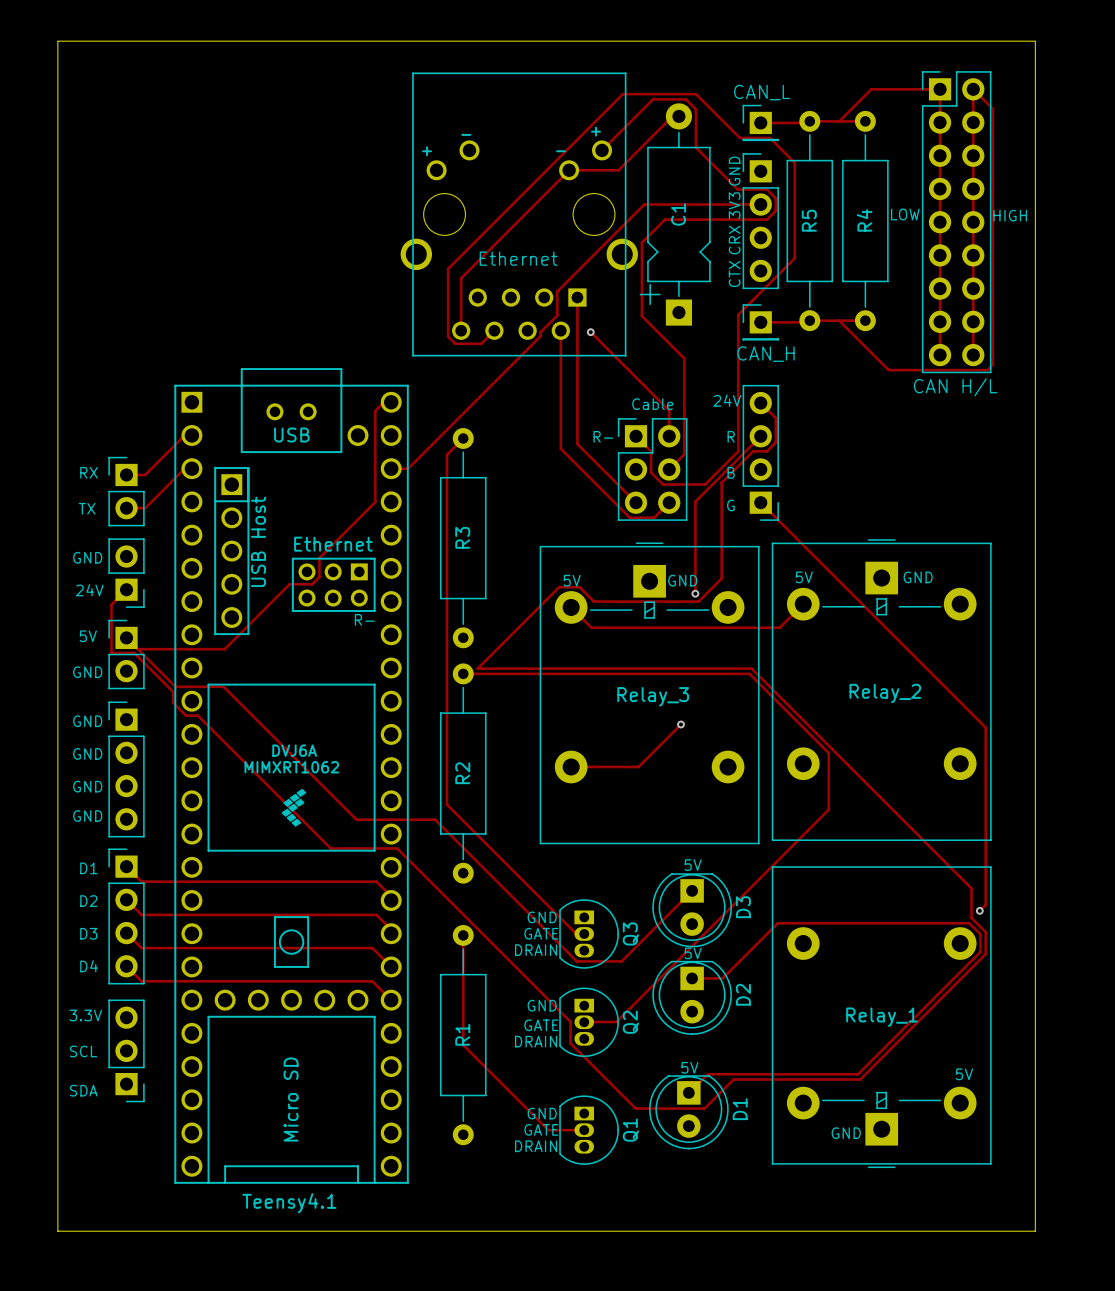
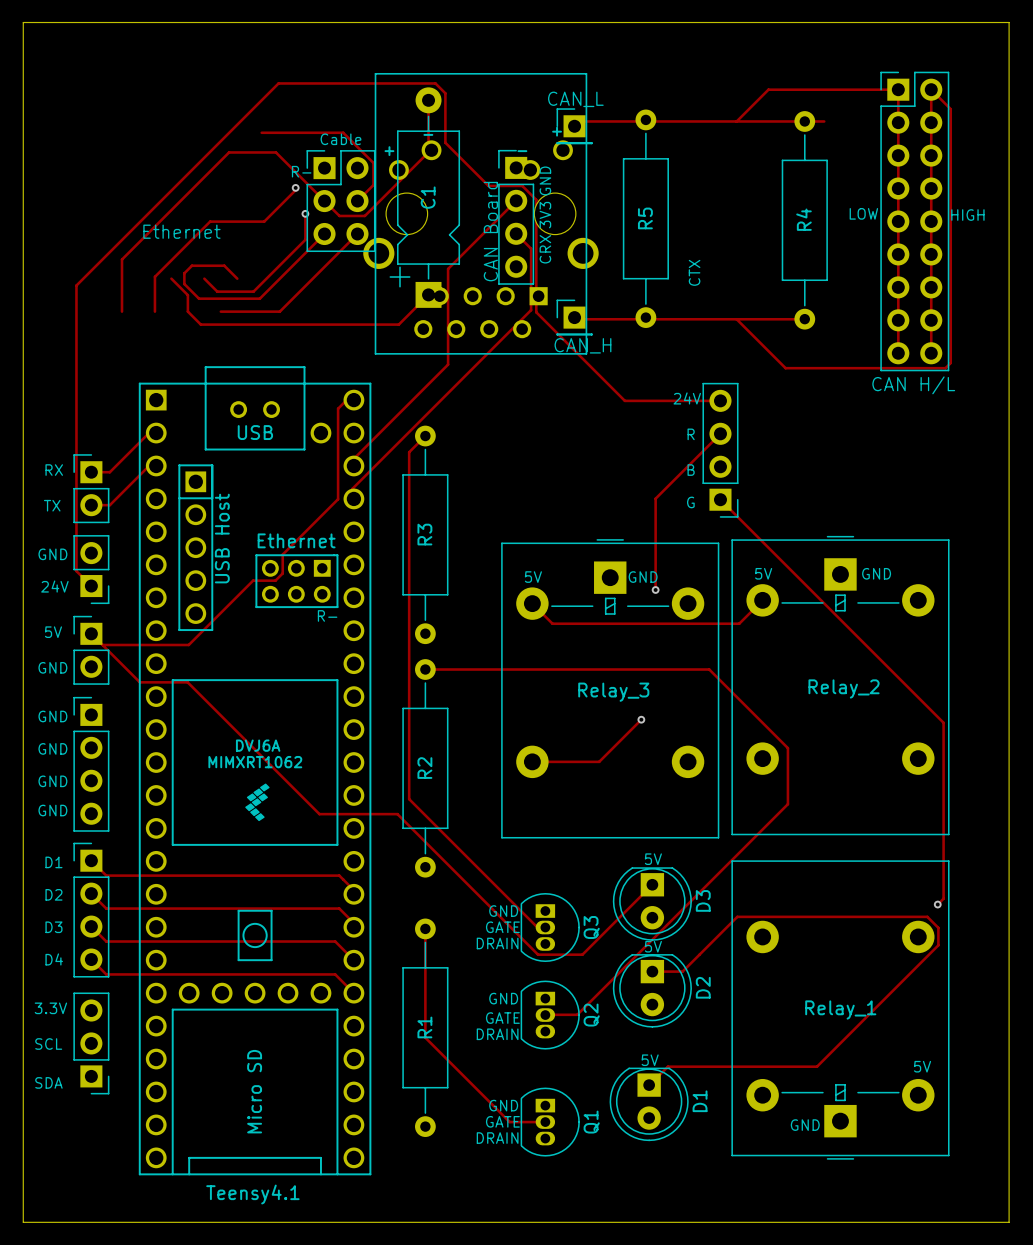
board edge: (57, 41) (1035, 41) (1035, 1231) -> (23, 41) (23, 22) (1009, 22) (1009, 1222) (992, 1222)
track: (871, 89) (839, 121) -> (830, 89) (768, 89) (736, 121)
text position: CAN_L (762, 92) -> CAN_L (575, 99)
track: none -> (428, 100) (428, 152) (364, 215) (339, 215) (275, 152) (229, 152) (121, 259) (121, 311)
track: (672, 116) (618, 170) (569, 170) (461, 278) (461, 330) -> none
track: (809, 121) (808, 122) (757, 122) -> (769, 121) (574, 121)
part: (760, 122) -> none
part: none -> (574, 126)
track: none -> (261, 132) (343, 132) (373, 163) (373, 185) (357, 201)
text: none -> Cable (340, 139)
track: (602, 150) (653, 99) (685, 99) (695, 109) (695, 147) (737, 189) (767, 189) (775, 198) (775, 210) (767, 219) (665, 219) (641, 242) (641, 316) (684, 358) (684, 454) (669, 469) -> none
text position: GND (734, 171) -> GND (545, 180)
text: none -> R- (301, 171)
track: none -> (295, 187) (295, 190) (264, 221) (210, 221) (154, 276) (154, 311)
via: none -> (295, 187)
part: none -> (341, 201)
track: none -> (516, 200) (448, 268) (448, 364) (352, 460)
track: (760, 204) (644, 204) (557, 291) (557, 315) (540, 332) (540, 336) (408, 468) (391, 468) -> none
text position: 3V3 (734, 205) -> 3V3 (545, 215)
track: none -> (305, 213) (305, 239) (253, 291) (217, 291) (204, 278)
via: none -> (305, 213)
C1 position: (675, 214) -> (424, 197)
part position: (760, 221) -> (516, 217)
R5 position: (809, 221) -> (645, 218)
R4 position: (865, 221) -> (804, 220)
text: none -> CAN Board (490, 231)
track: none -> (324, 234) (259, 298) (198, 298) (184, 284) (184, 273) (191, 265) (224, 265) (237, 278)
track: none -> (357, 234) (279, 311) (220, 311)
track: none -> (516, 233) (531, 248) (531, 310) (352, 488)
text position: CRX (734, 240) -> CRX (545, 249)
text position: Ethernet (518, 258) -> Ethernet (181, 231)
track: none -> (171, 278) (187, 295) (187, 311) (200, 324) (398, 324) (428, 294)
track: (577, 297) (577, 444) (636, 502) -> none
part: none -> (574, 317)
track: none -> (574, 319) (803, 319) (804, 320)
track: (839, 320) (888, 370) -> (736, 319) (785, 368) (847, 368)
track: (865, 320) (760, 322) -> none
part: (760, 322) -> none
track: (494, 330) (481, 343) (455, 343) (448, 336) (448, 268) (622, 94) (696, 94) (739, 137) (769, 137) (794, 162) (794, 258) (738, 314) (738, 451) (705, 484) (663, 484) (651, 472) (651, 451) (636, 436) -> none
track: (560, 330) (560, 448) (629, 517) (654, 517) (669, 502) -> none
track: (590, 332) (669, 410) (669, 436) -> none
via: (590, 332) -> none
text position: CAN_H (765, 354) -> CAN_H (582, 345)
track: (760, 403) (775, 418) (775, 442) (767, 451) (753, 451) (721, 482) (721, 578) (698, 601) (593, 601) (579, 587) (559, 587) (477, 668) (751, 668) (971, 888) (971, 918) (985, 932) (985, 954) (860, 1079) (733, 1079) (704, 1108) (635, 1108) (570, 1043) (570, 1021) (397, 848) (330, 848) (197, 715) (185, 715) (173, 702) (173, 692) (134, 652) (111, 652) (111, 604) (126, 589) -> (720, 400) (624, 400) (536, 312) (536, 199) (522, 185) (488, 185) (445, 142) (445, 93) (435, 83) (278, 83) (76, 285) (76, 571) (91, 586)
text: Cable (652, 404) -> none
text: R- (603, 436) -> none
part: (652, 469) -> none

